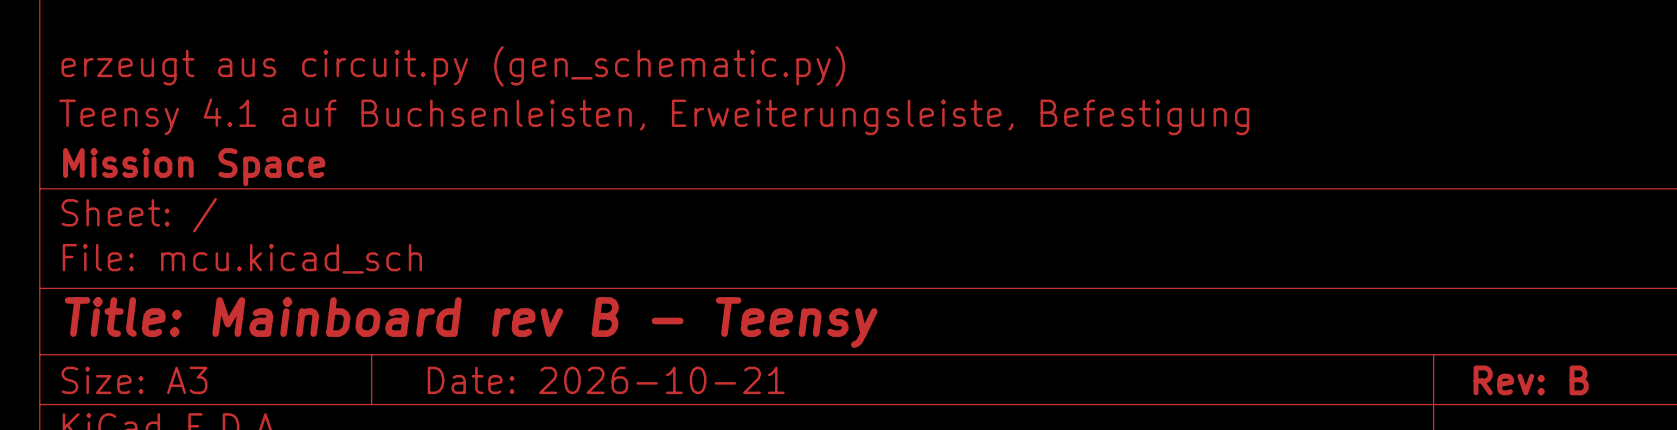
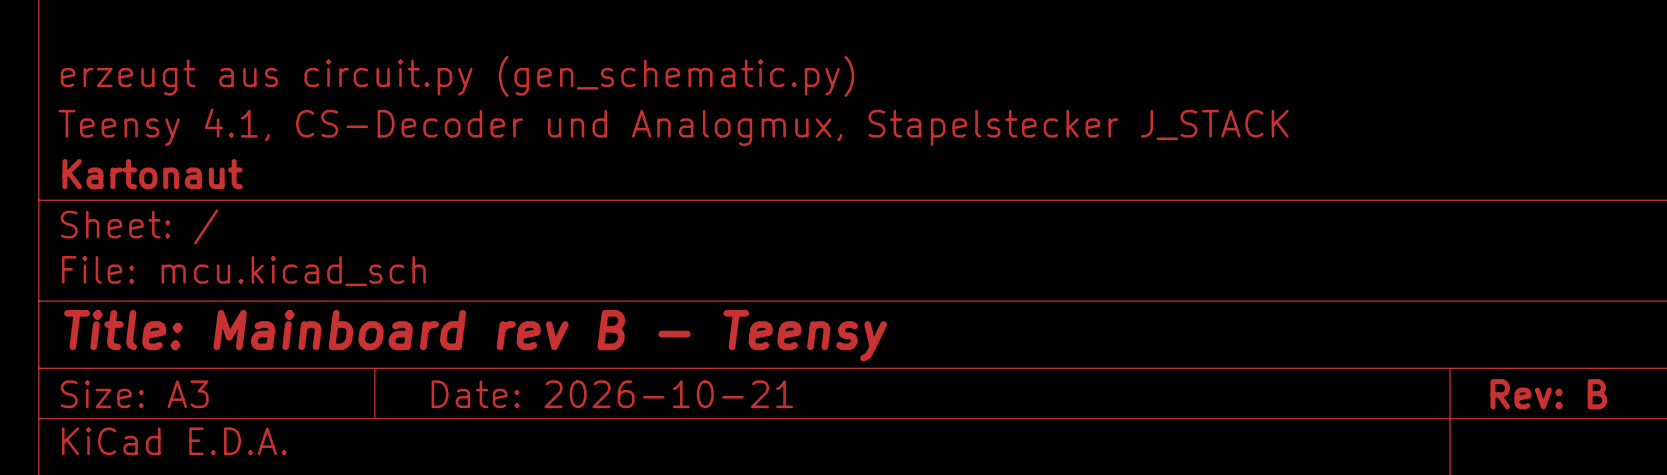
title block: Teensy 4.1 auf Buchsenleisten, Erweiterungsleiste, Befestigung (654, 116) -> Teensy 4.1, CS-Decoder und Analogmux, Stapelstecker J_STACK (673, 127)
title block: Mission Space (194, 167) -> Kartonaut (152, 174)

